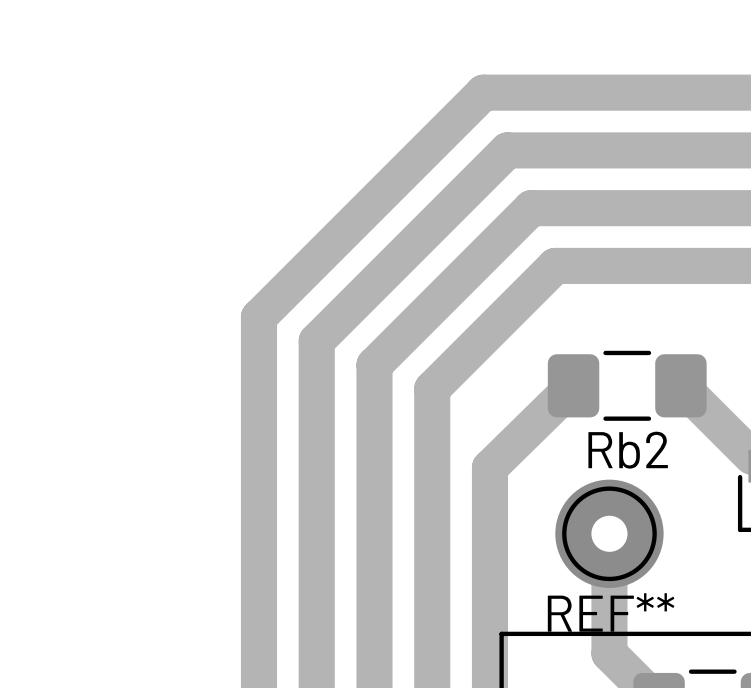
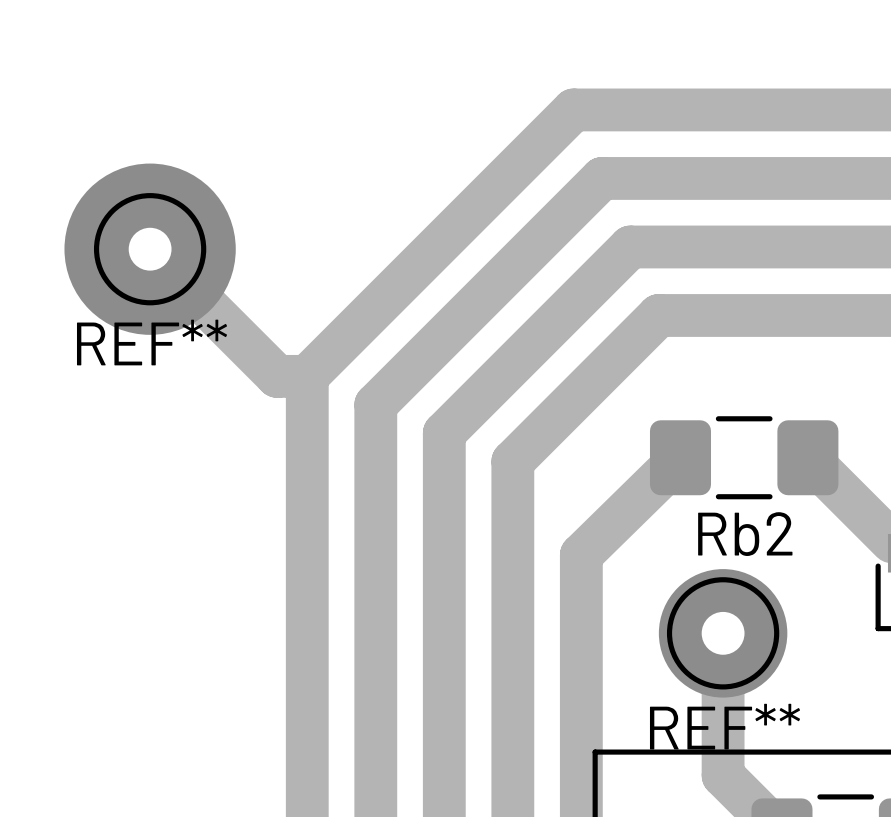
track: none -> (150, 249) (277, 376) (307, 376)
REF**: none -> (150, 249)

